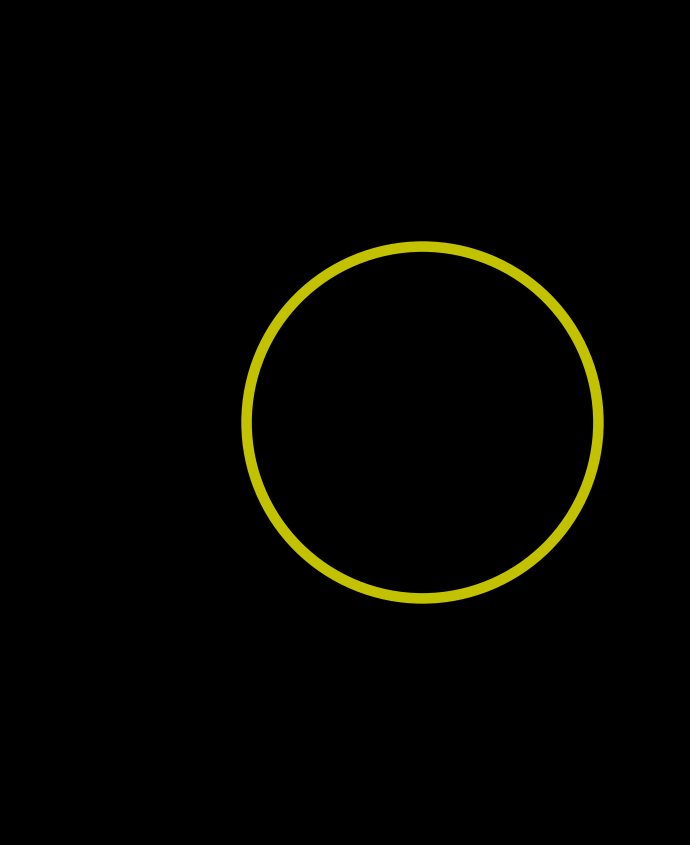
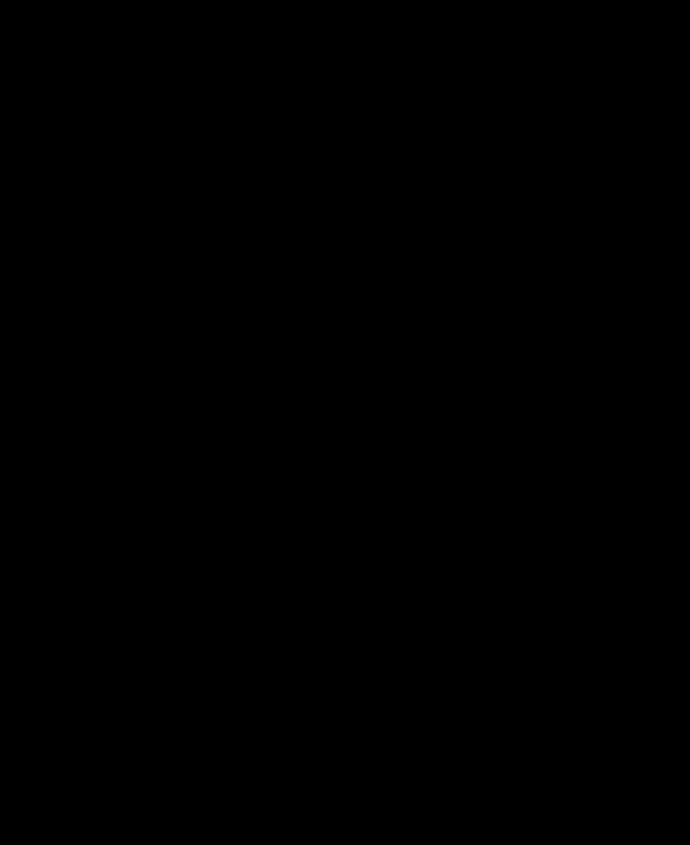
round board edge: [241, 241, 604, 604] -> none

